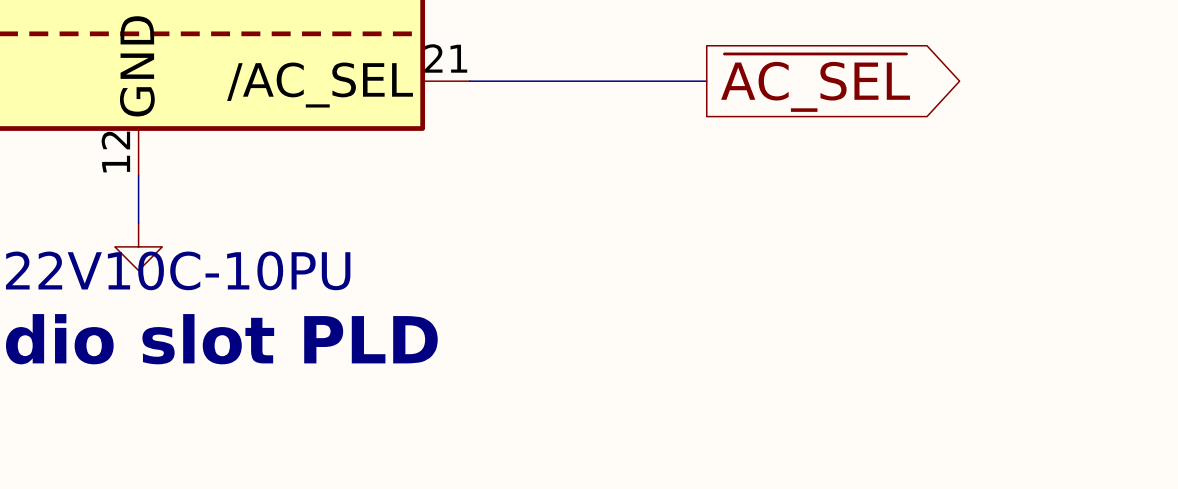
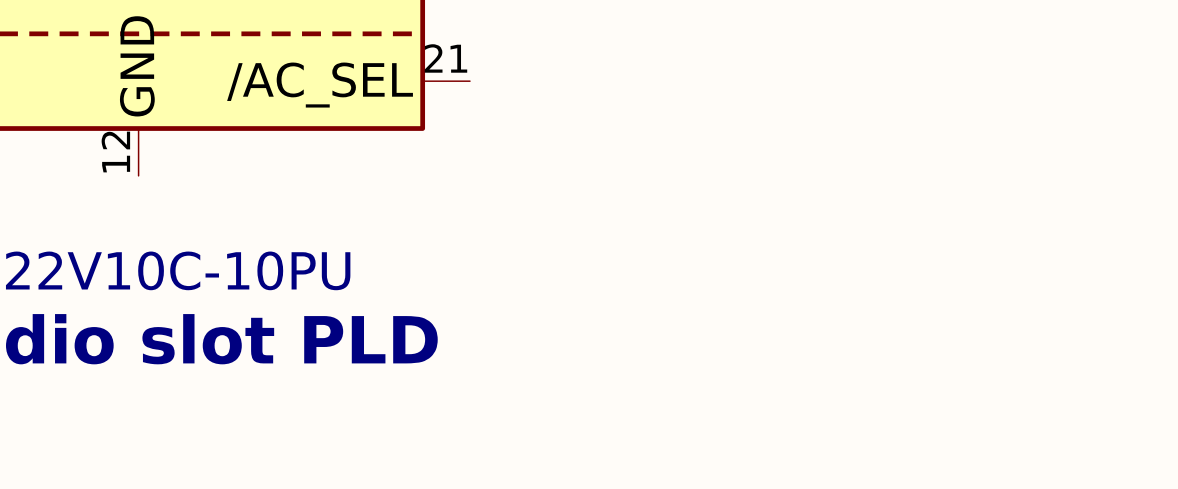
wire: (470, 81) (706, 81) -> none
global label: ~{AC_SEL} (815, 82) -> none
wire: (138, 175) (138, 223) -> none
power symbol: (138, 246) -> none

